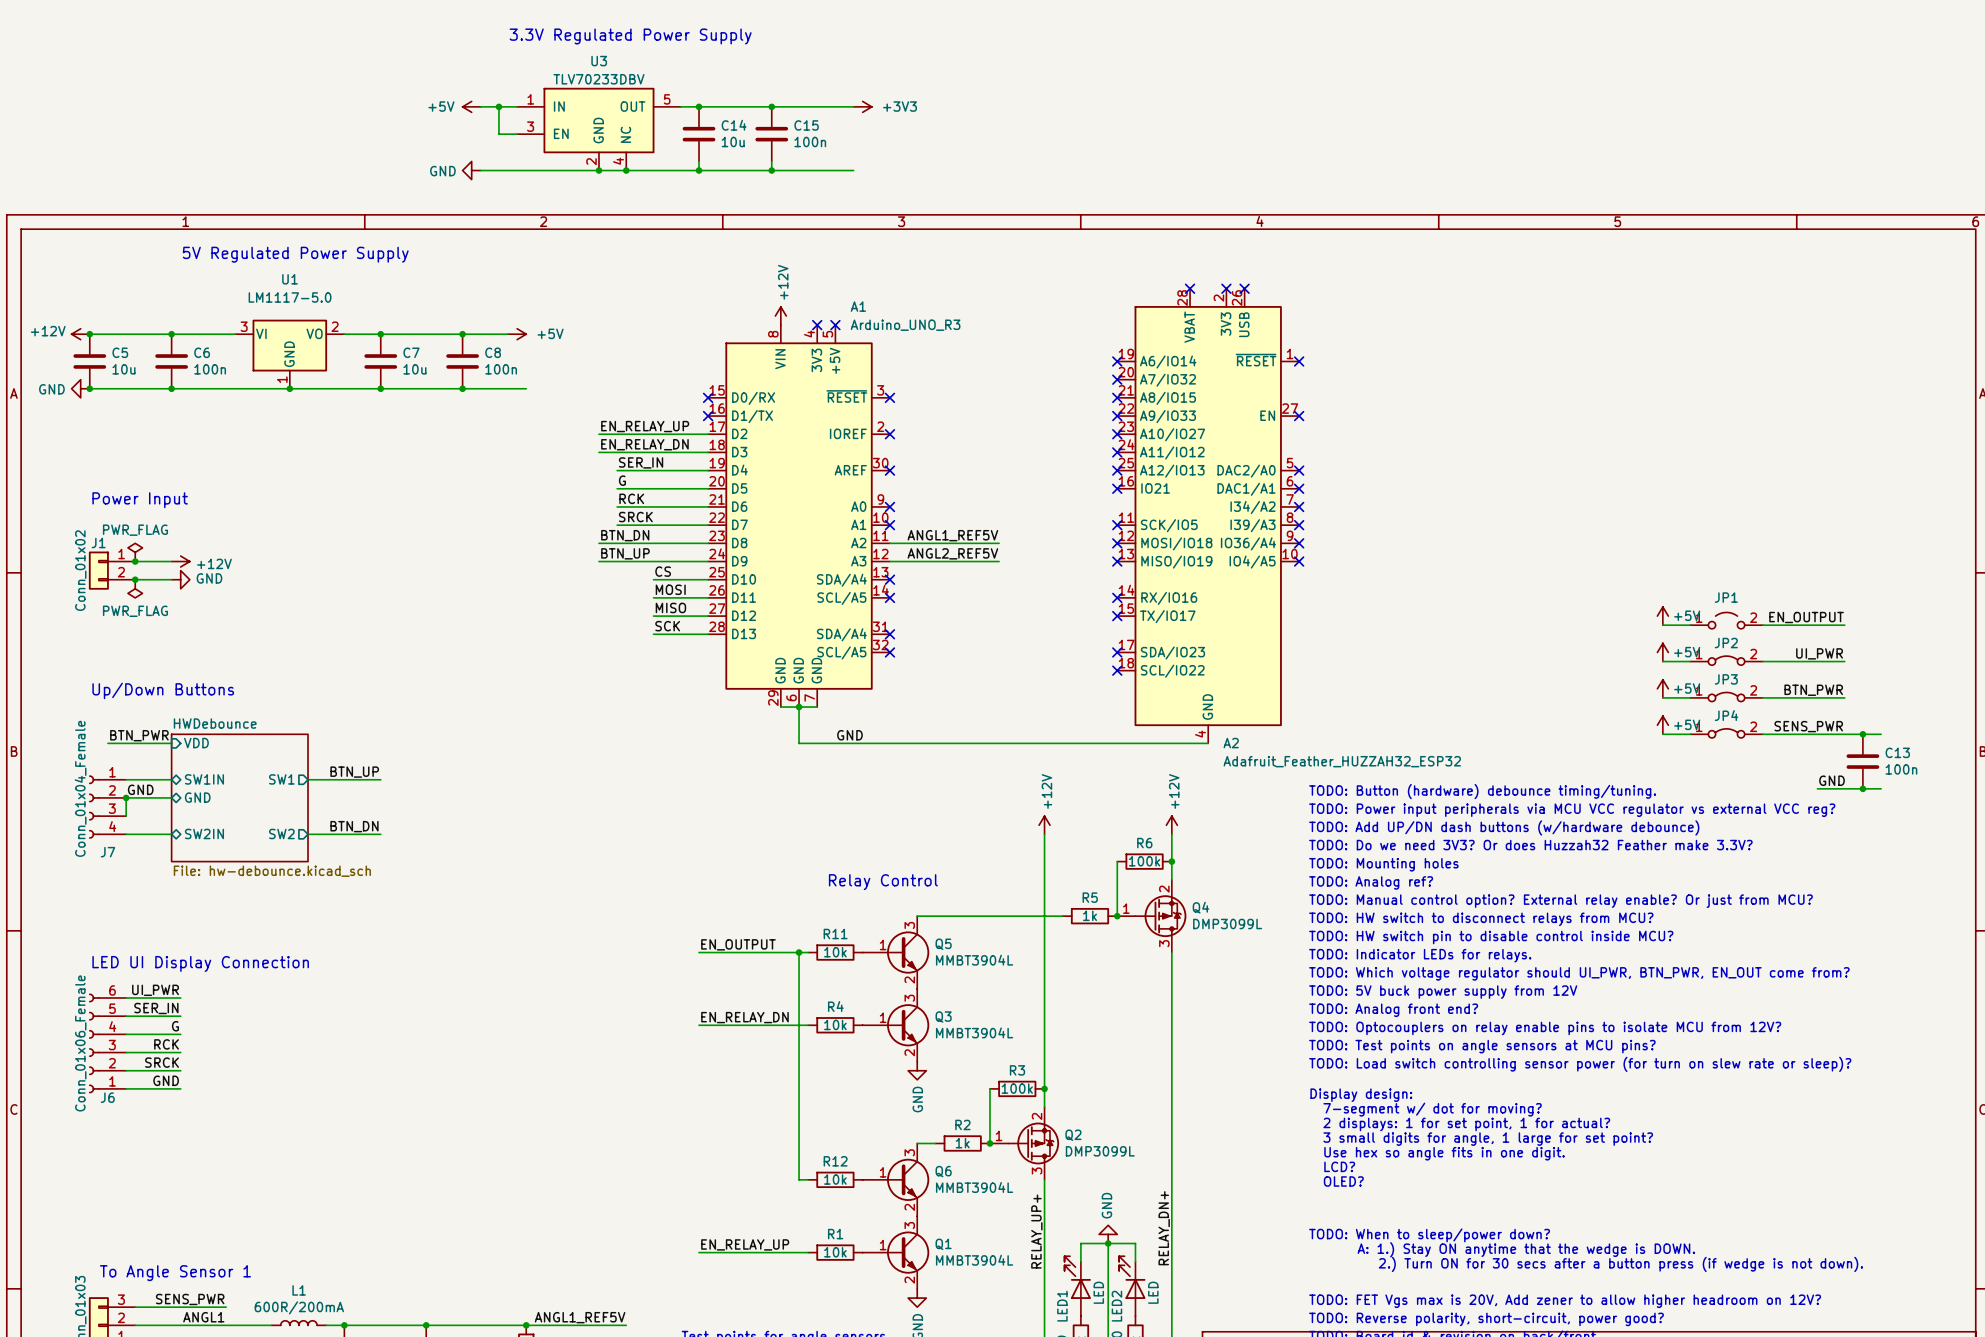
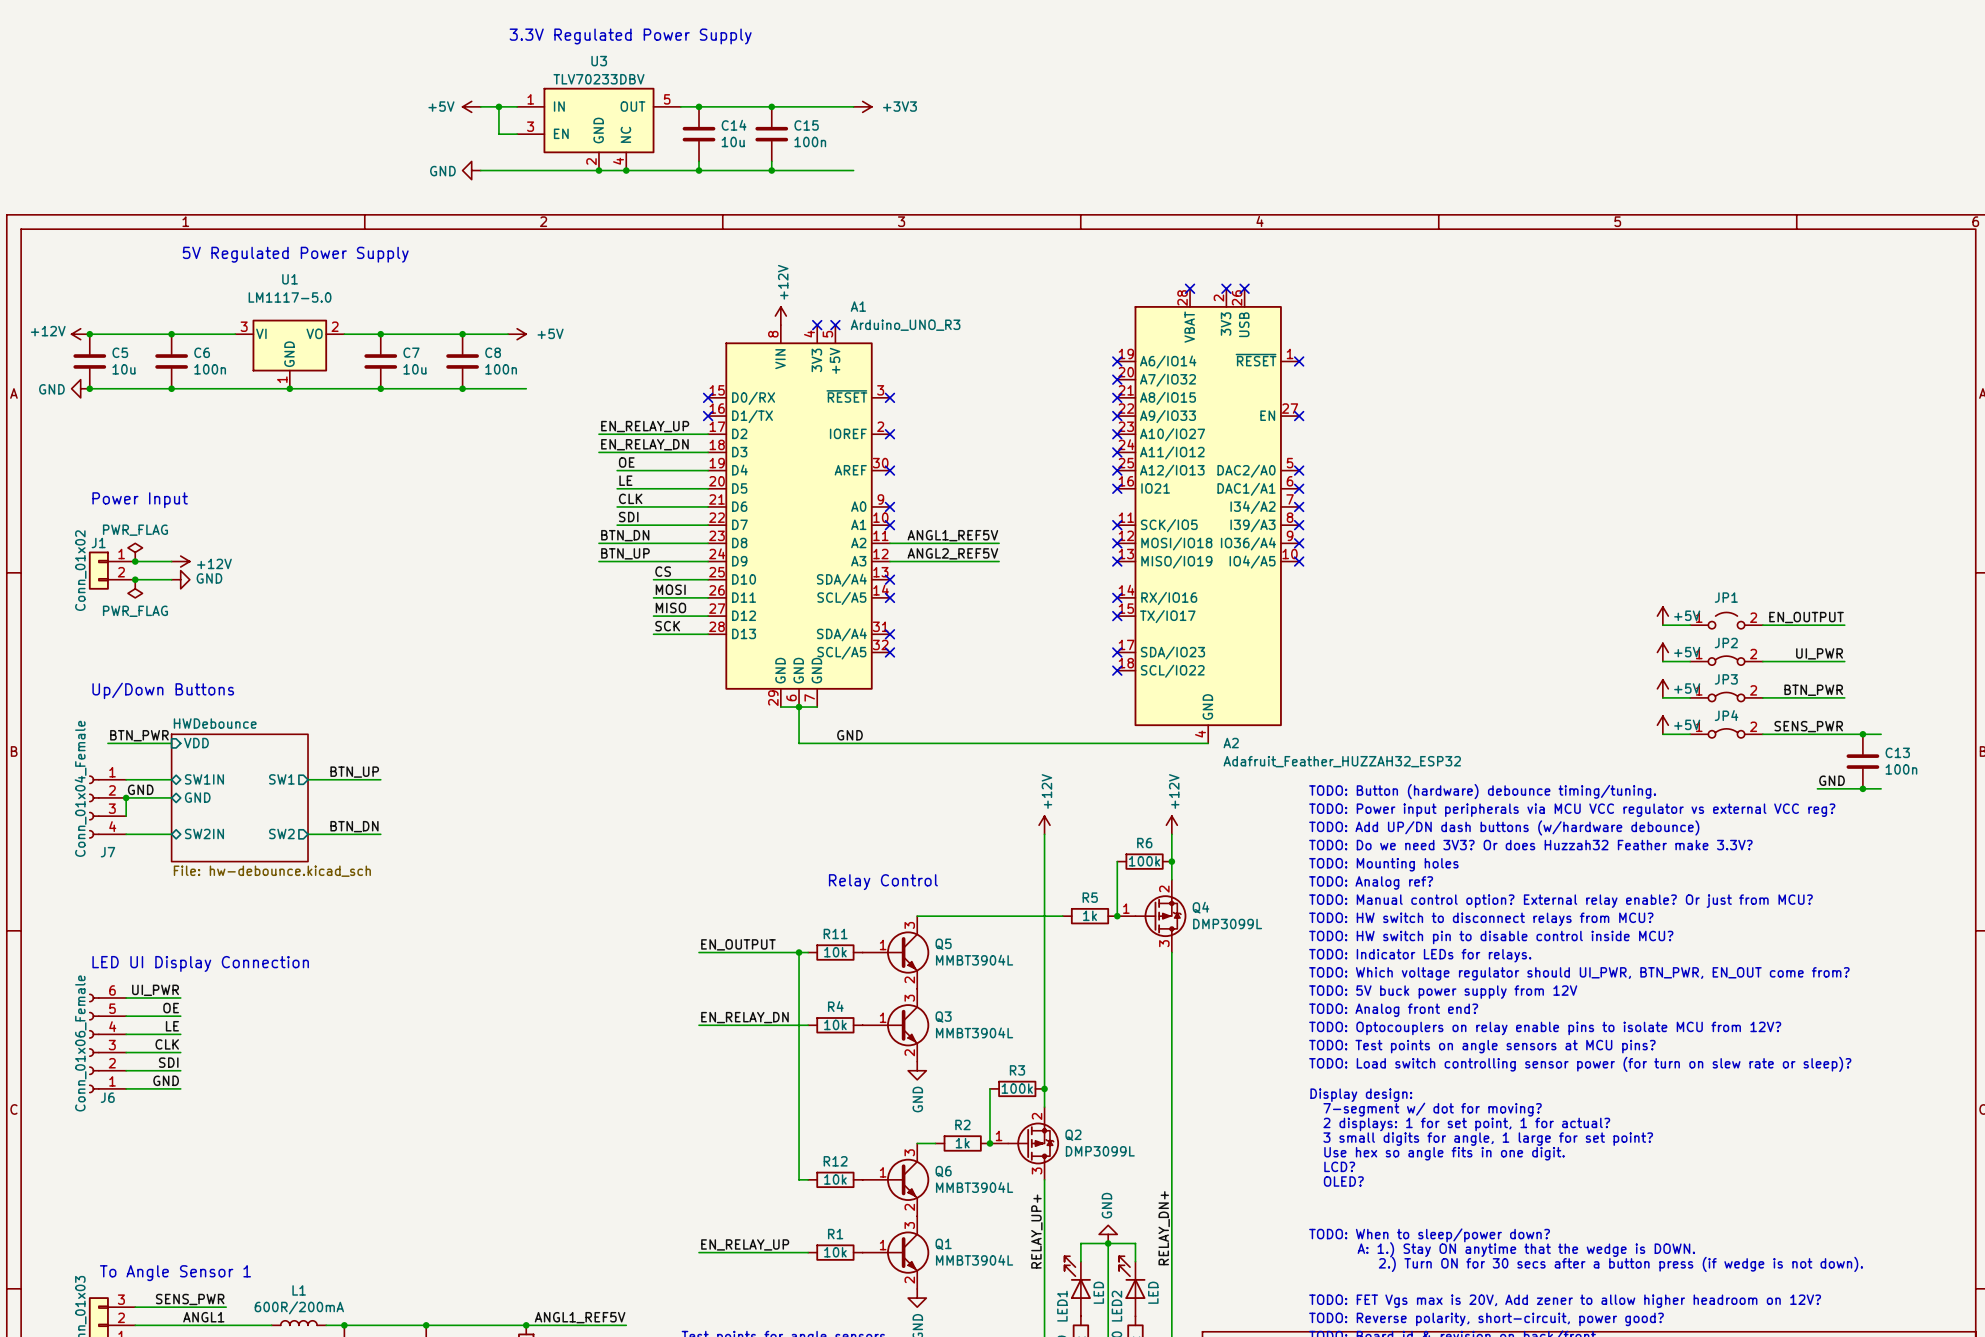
label: SER_IN (641, 462) -> OE (626, 462)
label: G (622, 480) -> LE (625, 480)
label: RCK (631, 498) -> CLK (630, 498)
label: SRCK (635, 517) -> SDI (628, 517)
label: SER_IN (156, 1008) -> OE (171, 1008)
label: G (175, 1026) -> LE (172, 1026)
label: RCK (166, 1044) -> CLK (167, 1044)
label: SRCK (162, 1062) -> SDI (168, 1062)

